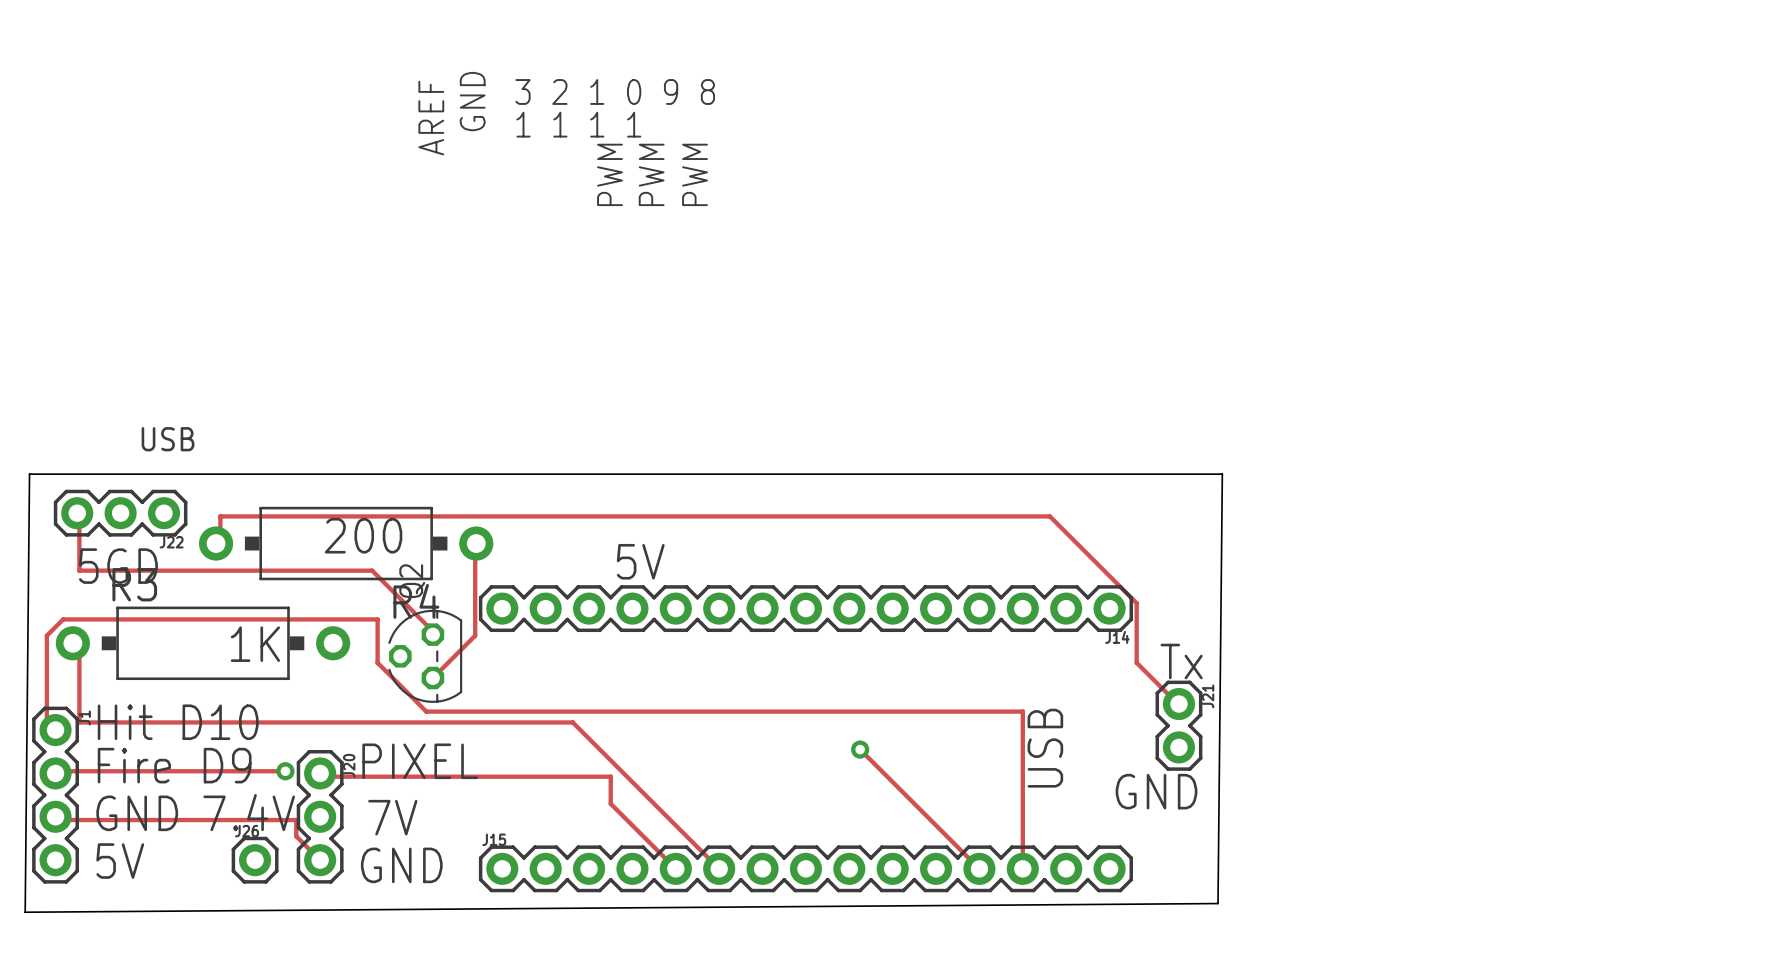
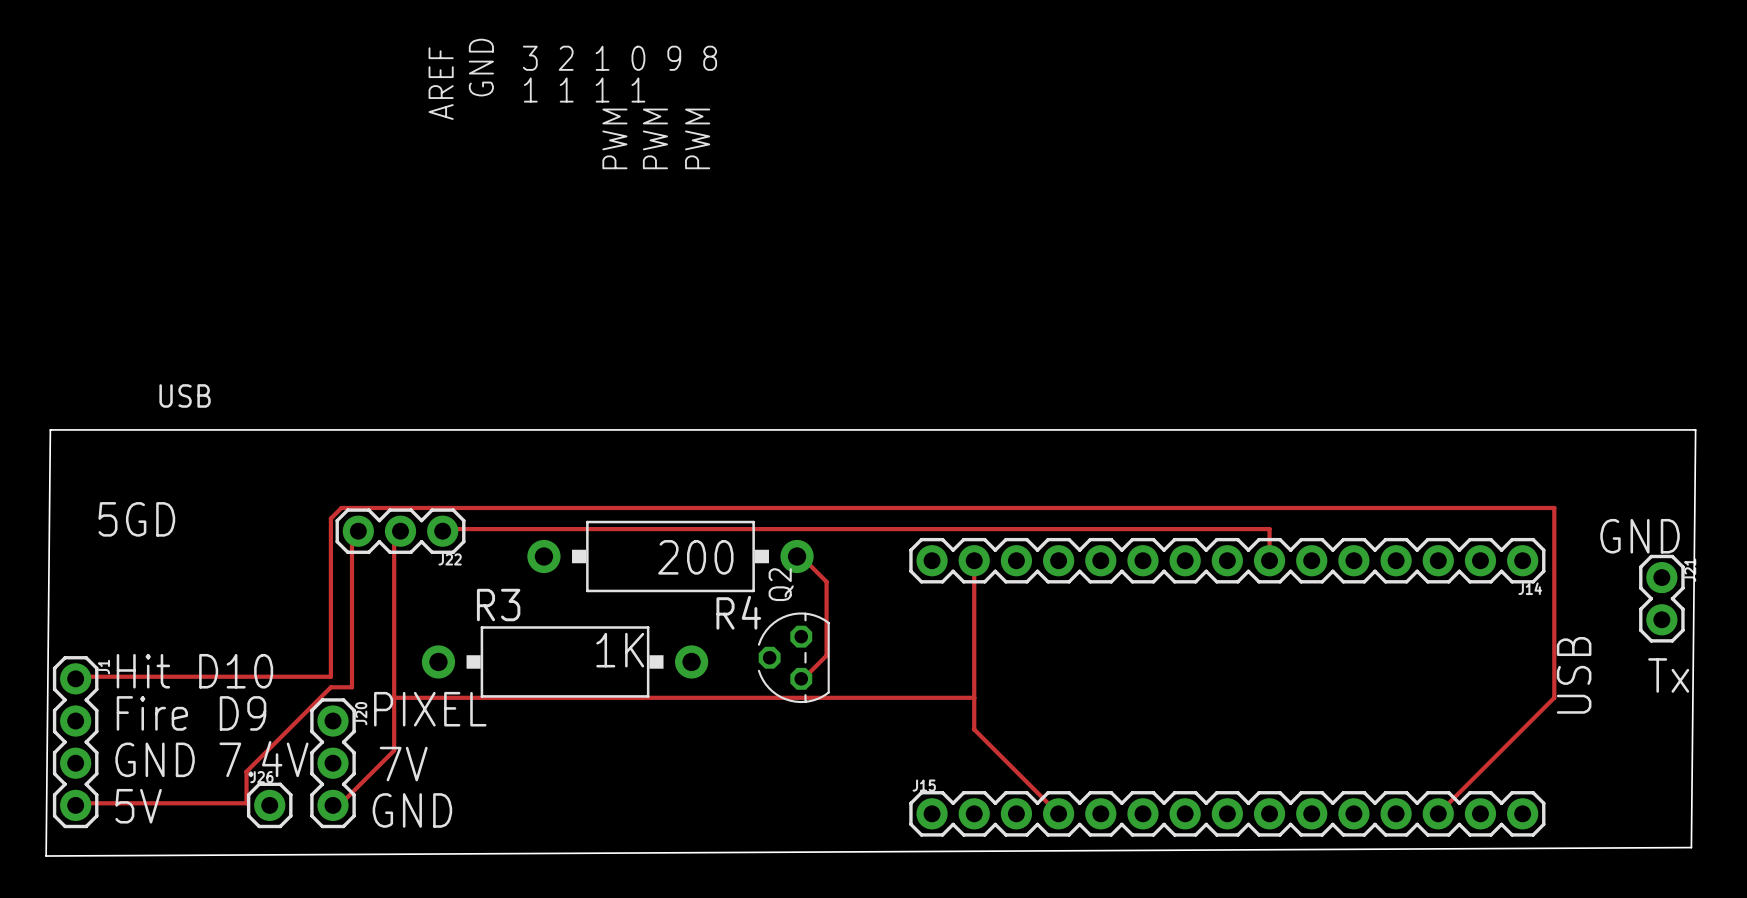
board edge: (1222, 474) (1218, 903) (25, 912) -> (1210, 429) (1695, 429) (1691, 847) (46, 856)
track: (77, 513) (79, 516) (79, 570) (372, 570) (431, 630) (432, 634) -> none
J22 position: (120, 513) -> (400, 531)
text position: 200 (363, 535) -> 200 (695, 557)
track: (216, 543) (220, 543) (220, 516) (1049, 516) (1136, 603) (1136, 662) (1178, 704) -> none
R4 position: (346, 543) -> (670, 556)
track: (476, 543) (475, 635) (432, 678) -> none
text: 5V (640, 561) -> none
track: none -> (358, 531) (351, 539) (351, 687) (330, 687) (246, 771) (246, 803) (77, 803) (75, 805)
track: none -> (442, 531) (446, 529) (1269, 529) (1269, 560)
text: none -> GND (1640, 536)
track: none -> (797, 556) (805, 560) (826, 581) (826, 655) (801, 678)
J14 position: (805, 608) -> (1227, 560)
track: none -> (974, 560) (974, 729) (1058, 813)
track: (72, 643) (79, 651) (79, 722) (572, 722) (719, 868) -> none
R3 position: (203, 643) -> (565, 661)
text position: 1K (255, 644) -> 1K (620, 650)
Q2 position: (425, 656) -> (793, 657)
text: Tx (1181, 661) -> none
J21 position: (1178, 725) -> (1661, 598)
text: none -> USB (1574, 675)
text: none -> Tx (1668, 675)
track: (55, 730) (46, 722) (46, 635) (63, 619) (377, 619) (377, 662) (426, 711) (1022, 711) (1022, 868) -> (75, 678) (77, 676) (330, 676) (330, 518) (341, 507) (1554, 507) (1554, 697) (1438, 813)
text: USB (1045, 748) -> none
track: none -> (394, 697) (974, 697)
track: (860, 749) (979, 868) -> none
via: (860, 749) -> none
track: (285, 771) (57, 771) (55, 773) -> none
via: (285, 771) -> none
track: (320, 773) (323, 776) (610, 776) (610, 803) (675, 868) -> none
text: GND (1156, 791) -> none
track: (55, 816) (57, 820) (296, 820) (296, 836) (320, 860) -> (400, 531) (394, 539) (394, 750) (341, 803) (333, 805)
J15 position: (805, 868) -> (1227, 813)

